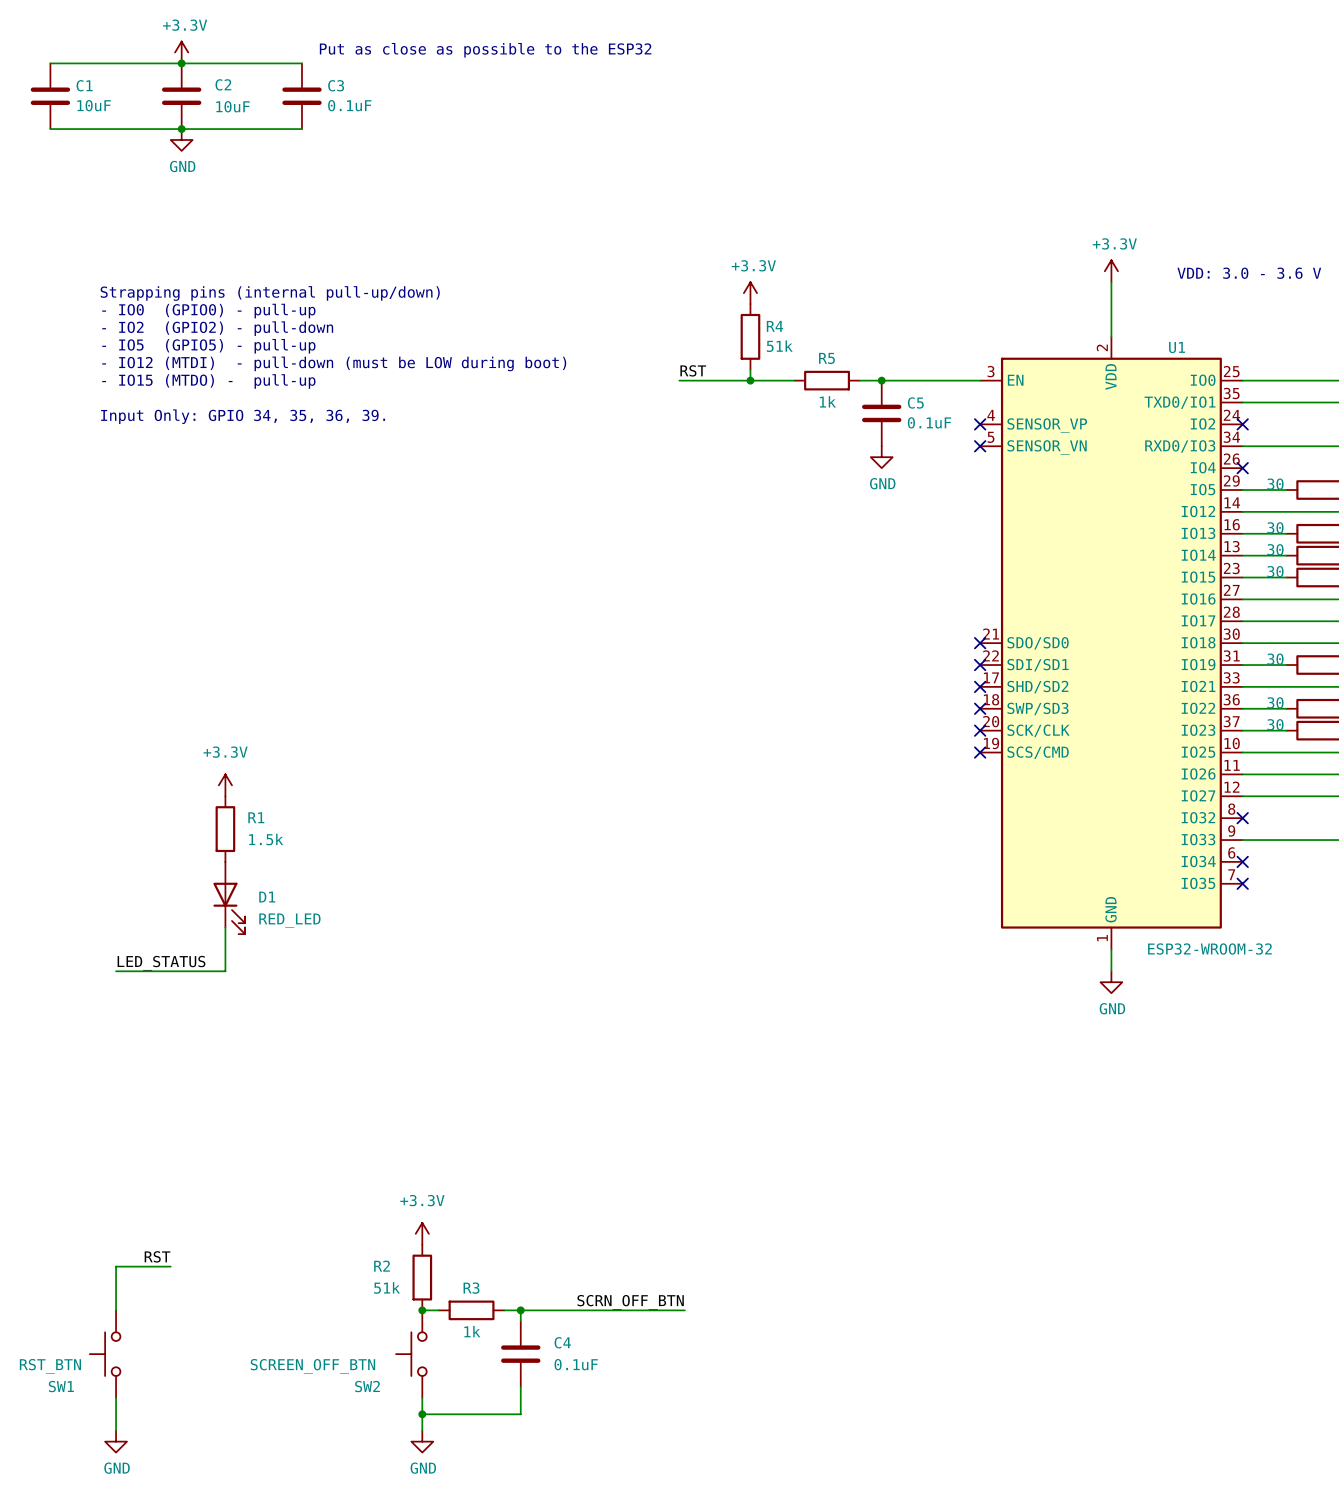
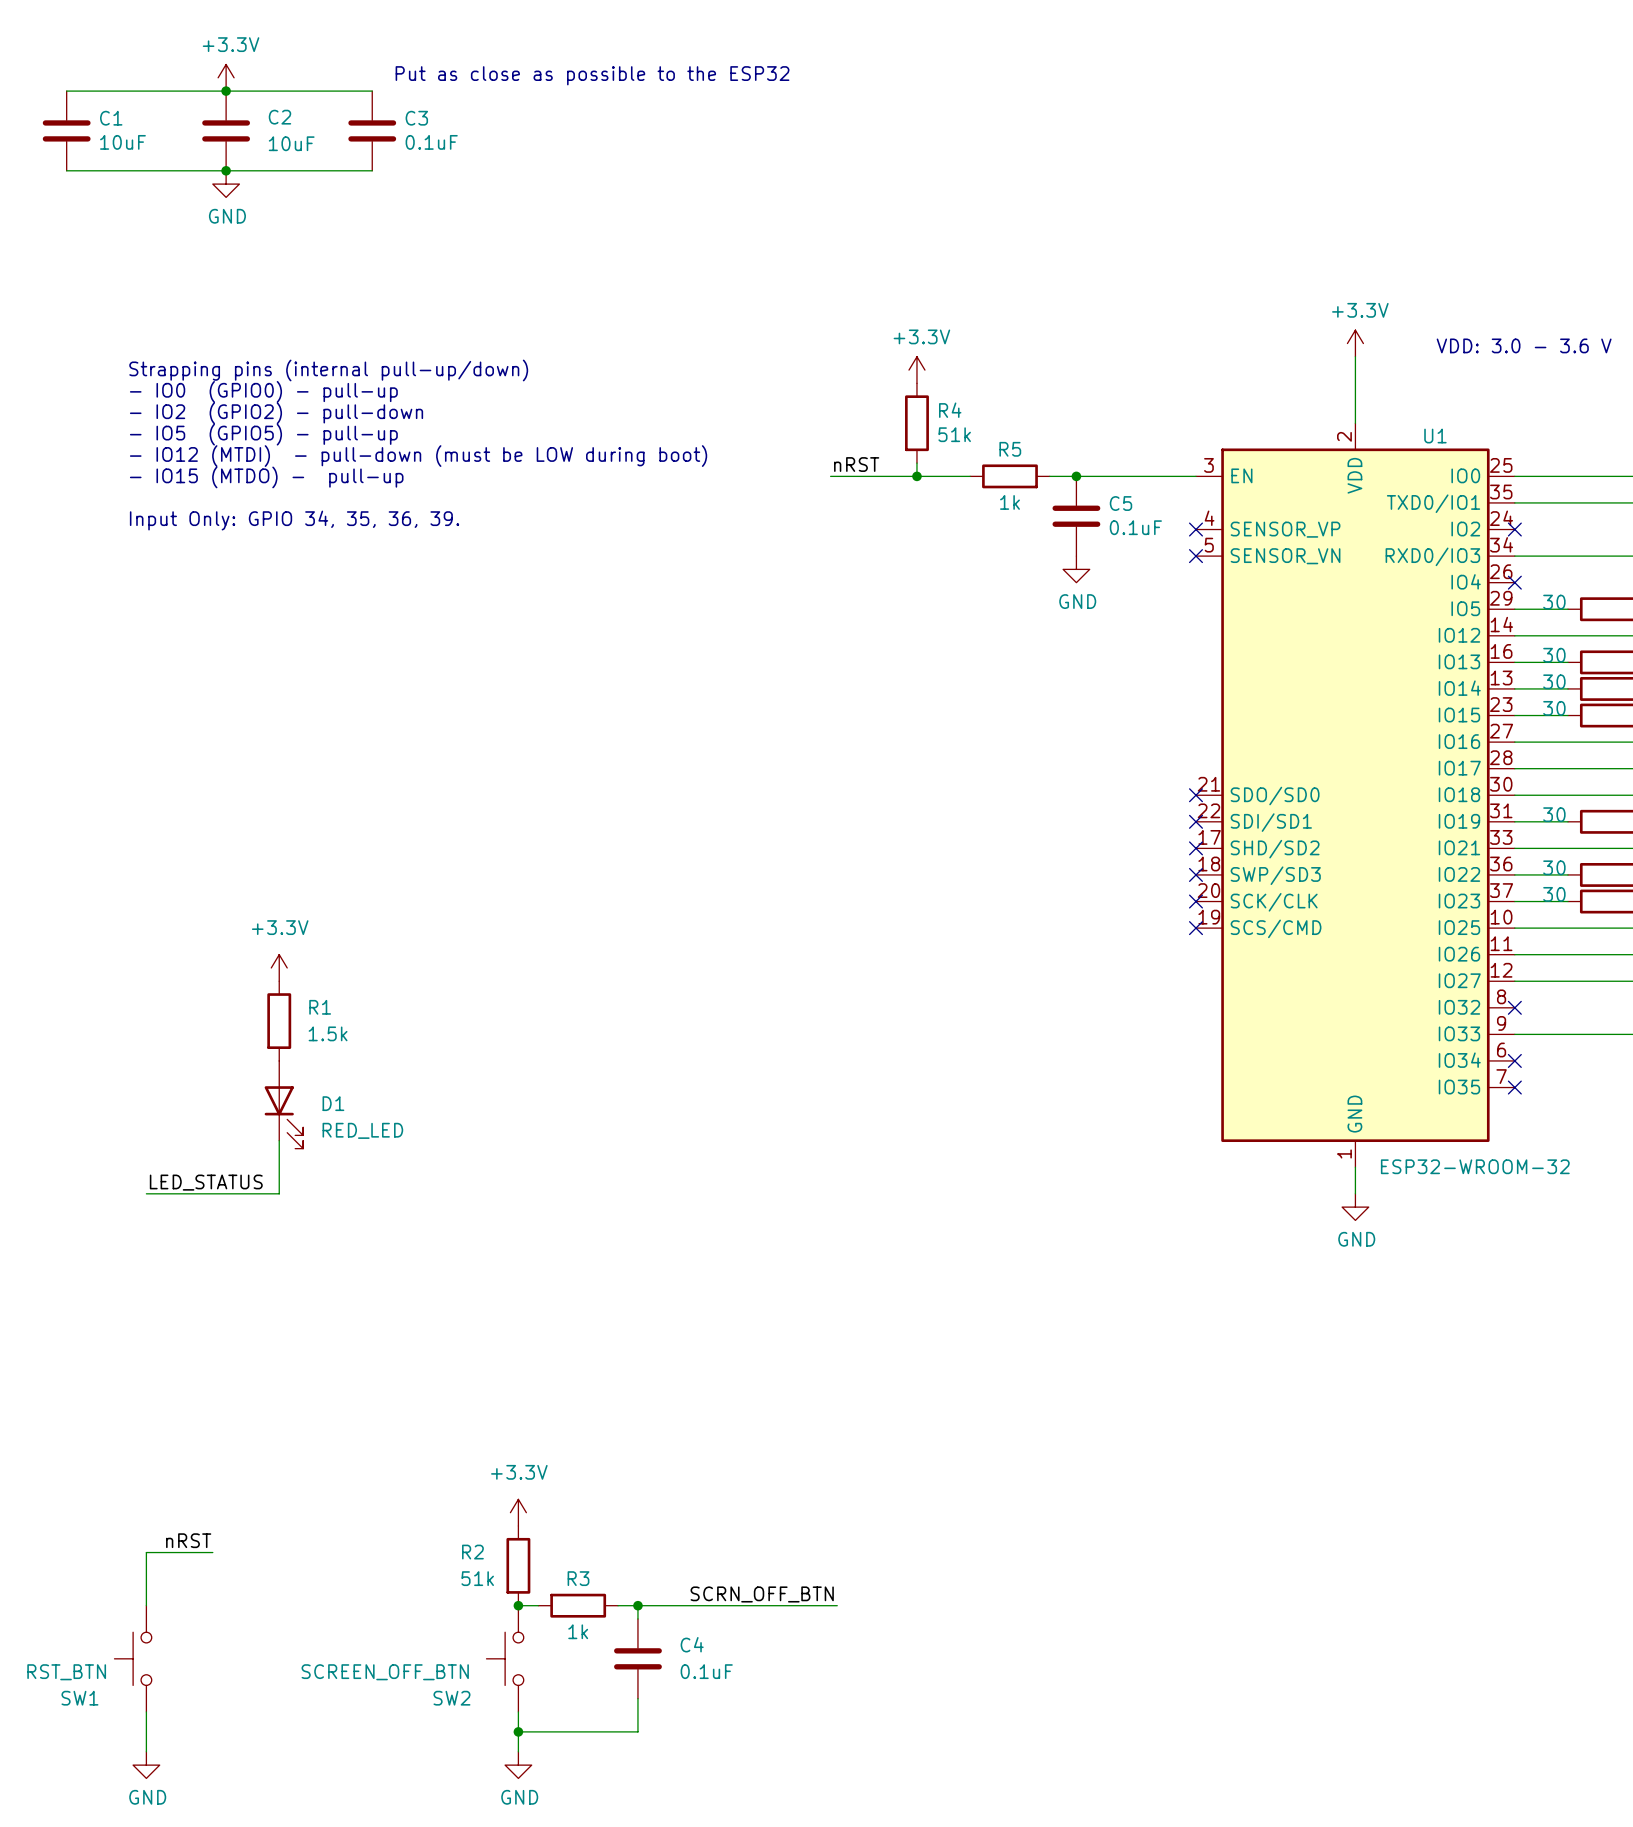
label: RST (693, 370) -> nRST (856, 464)
label: RST (157, 1256) -> nRST (188, 1540)

